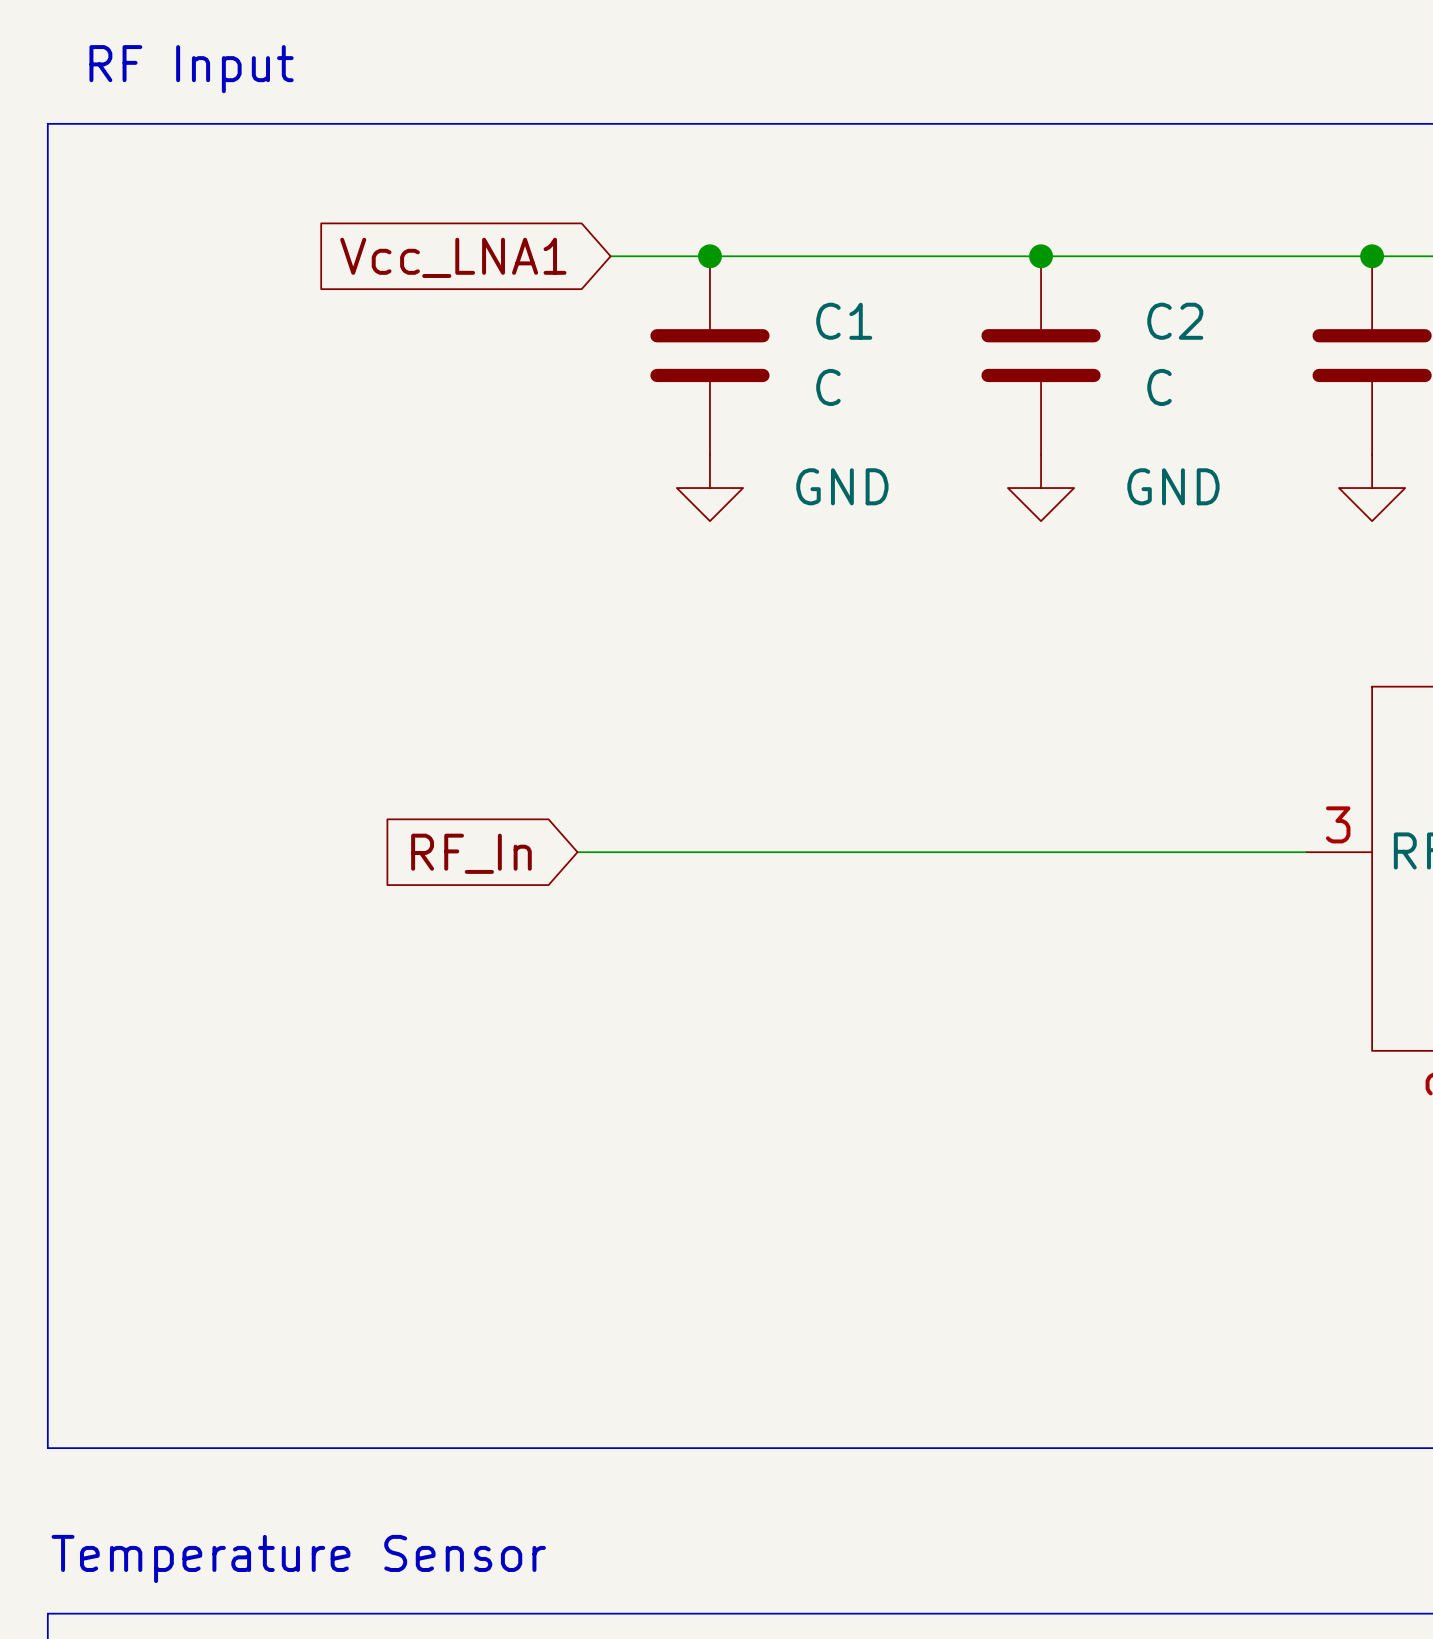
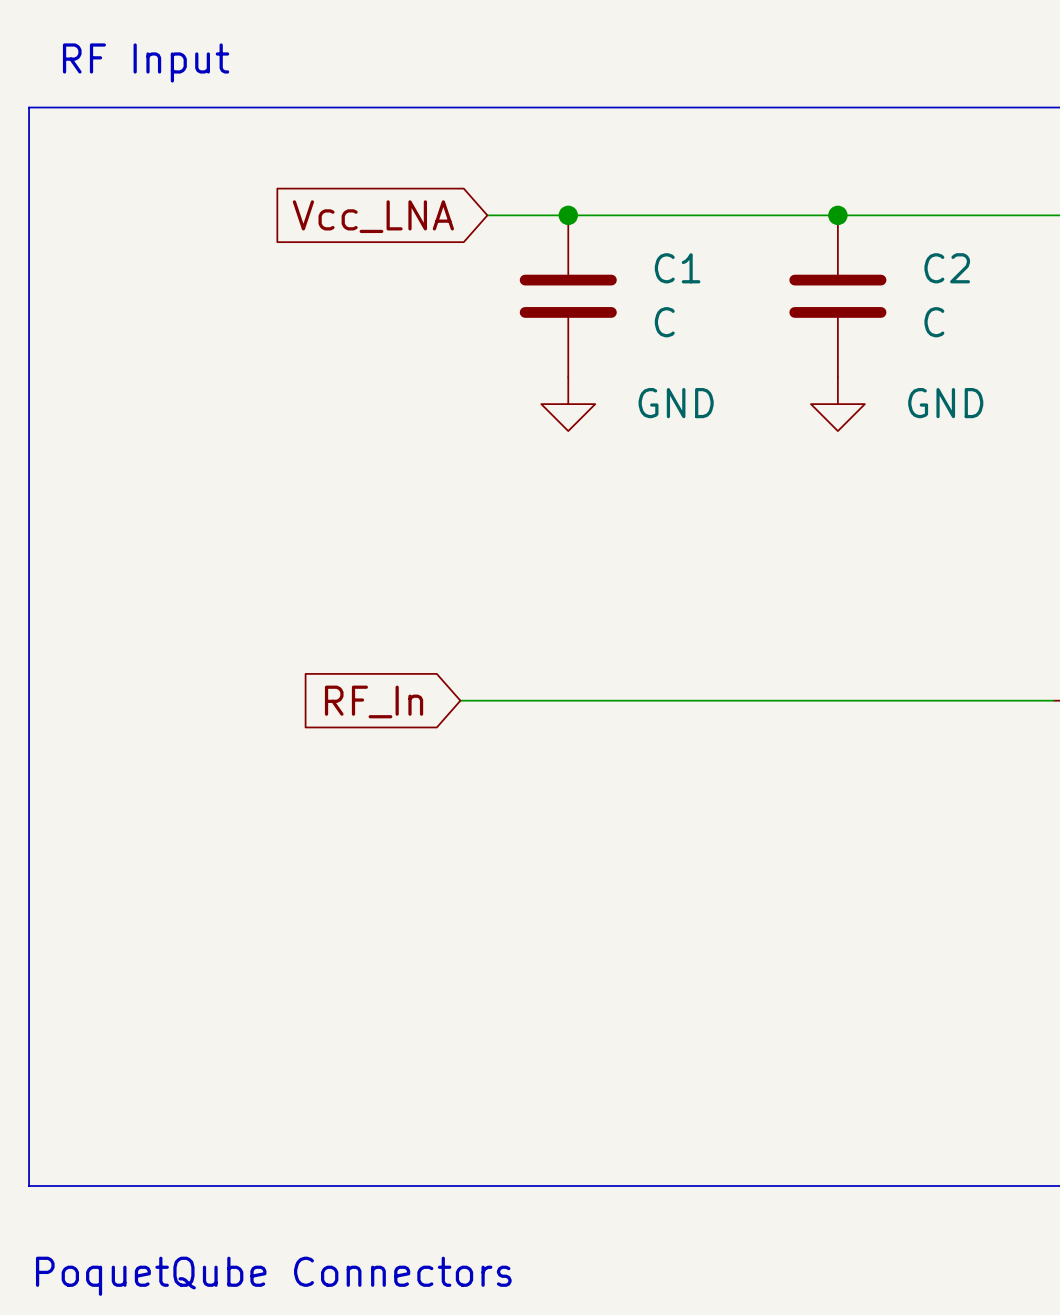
global label: Vcc_LNA1 (453, 257) -> Vcc_LNA (373, 216)
text: Temperature Sensor (298, 1558) -> PoquetQube Connectors (273, 1276)

